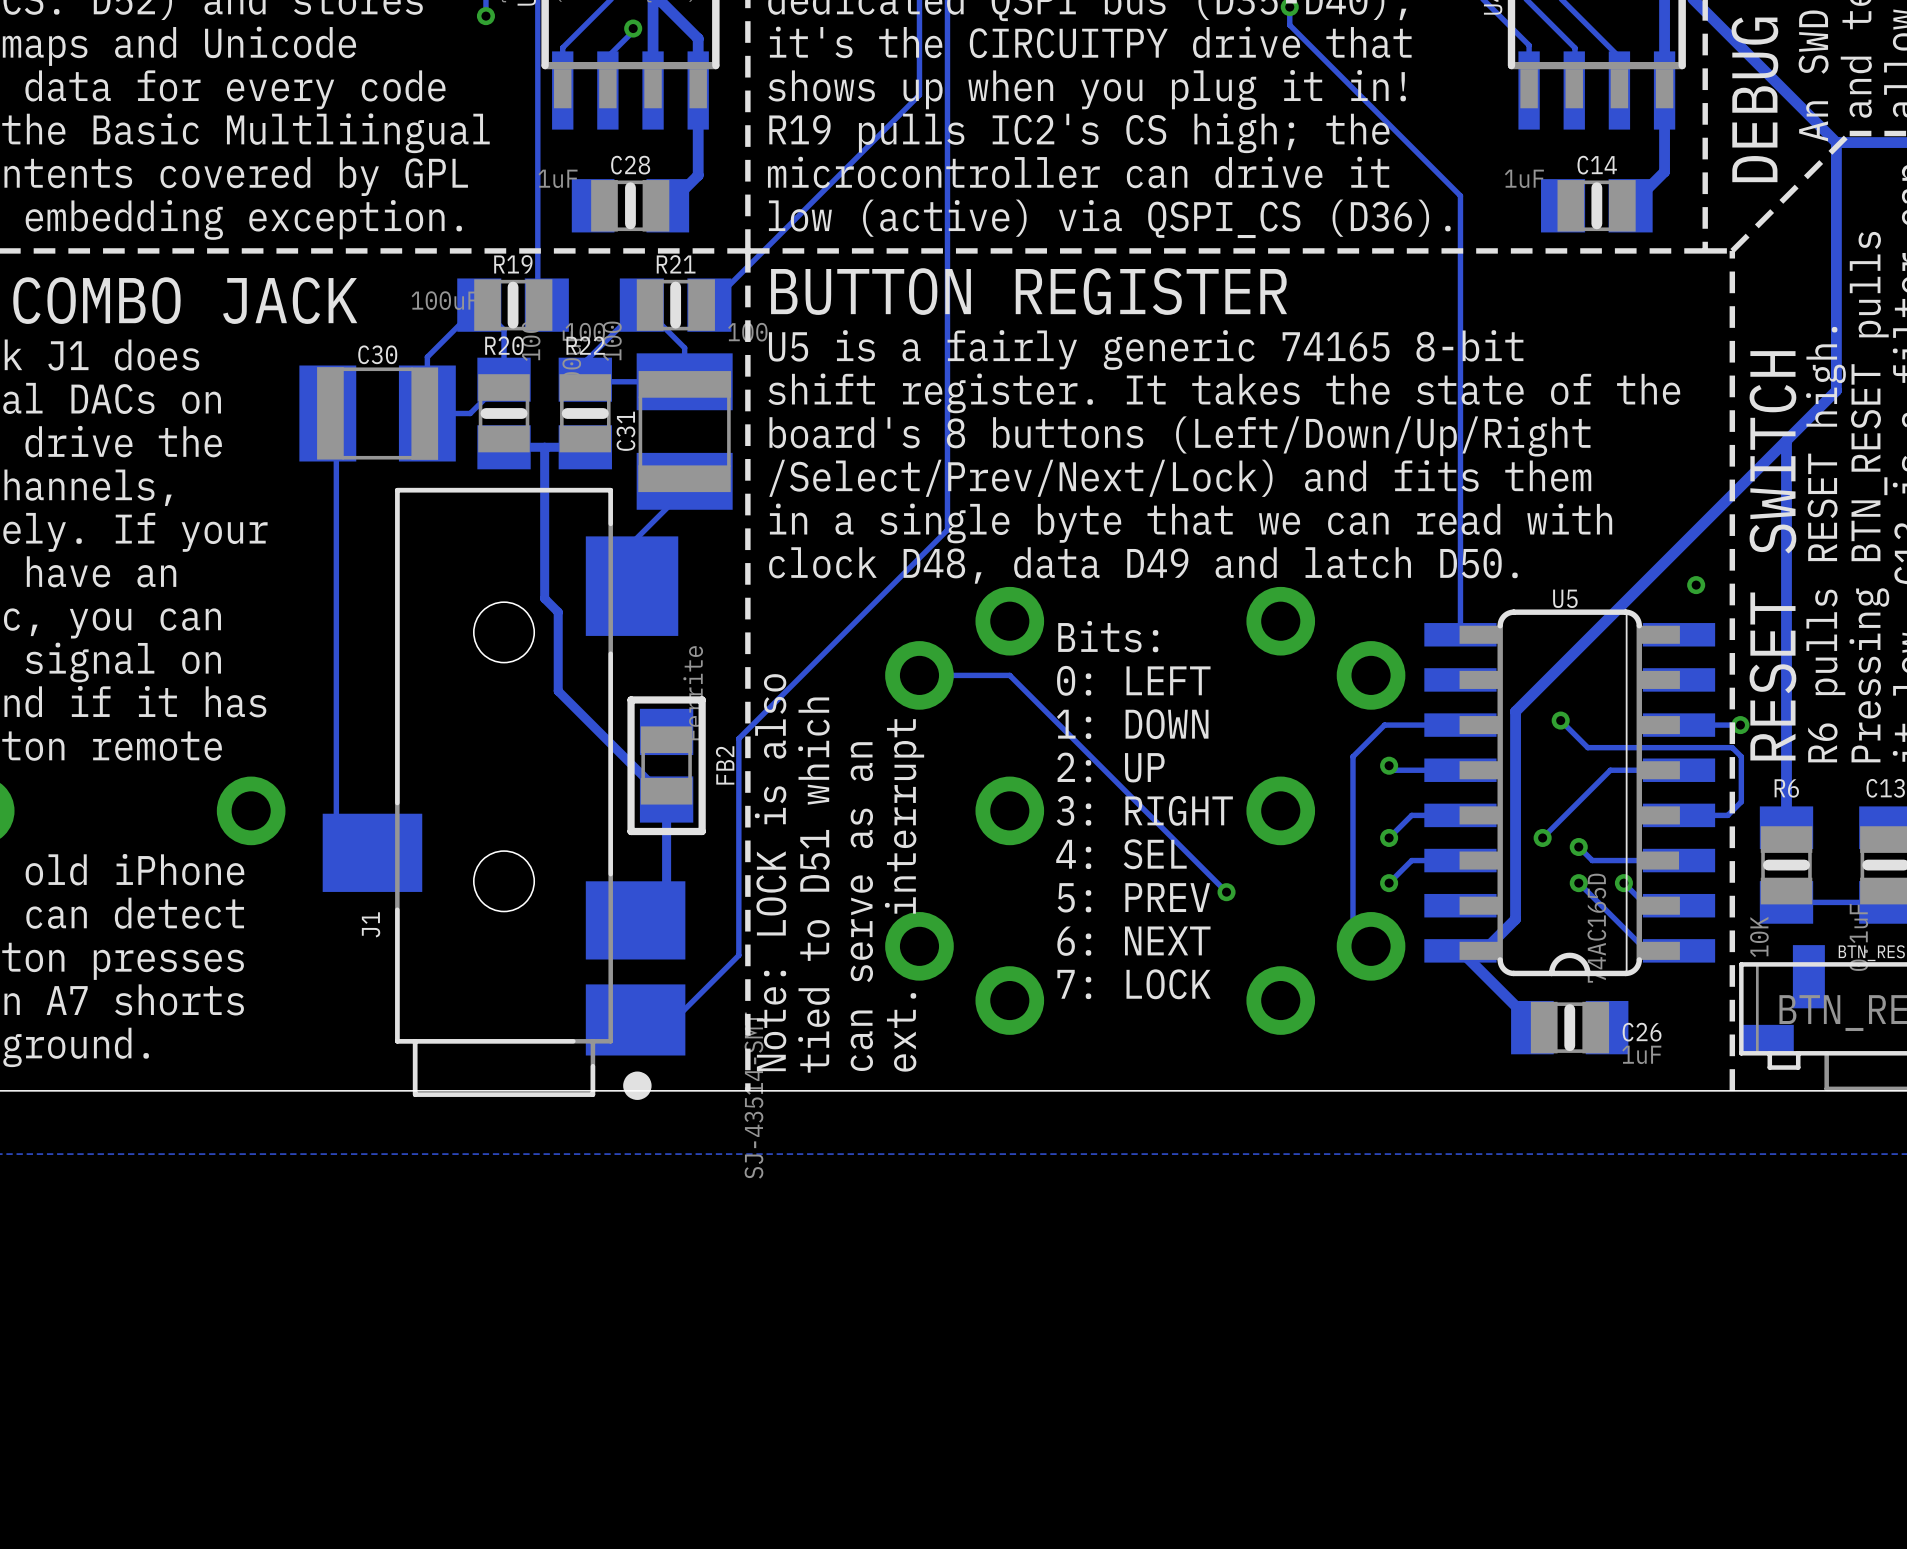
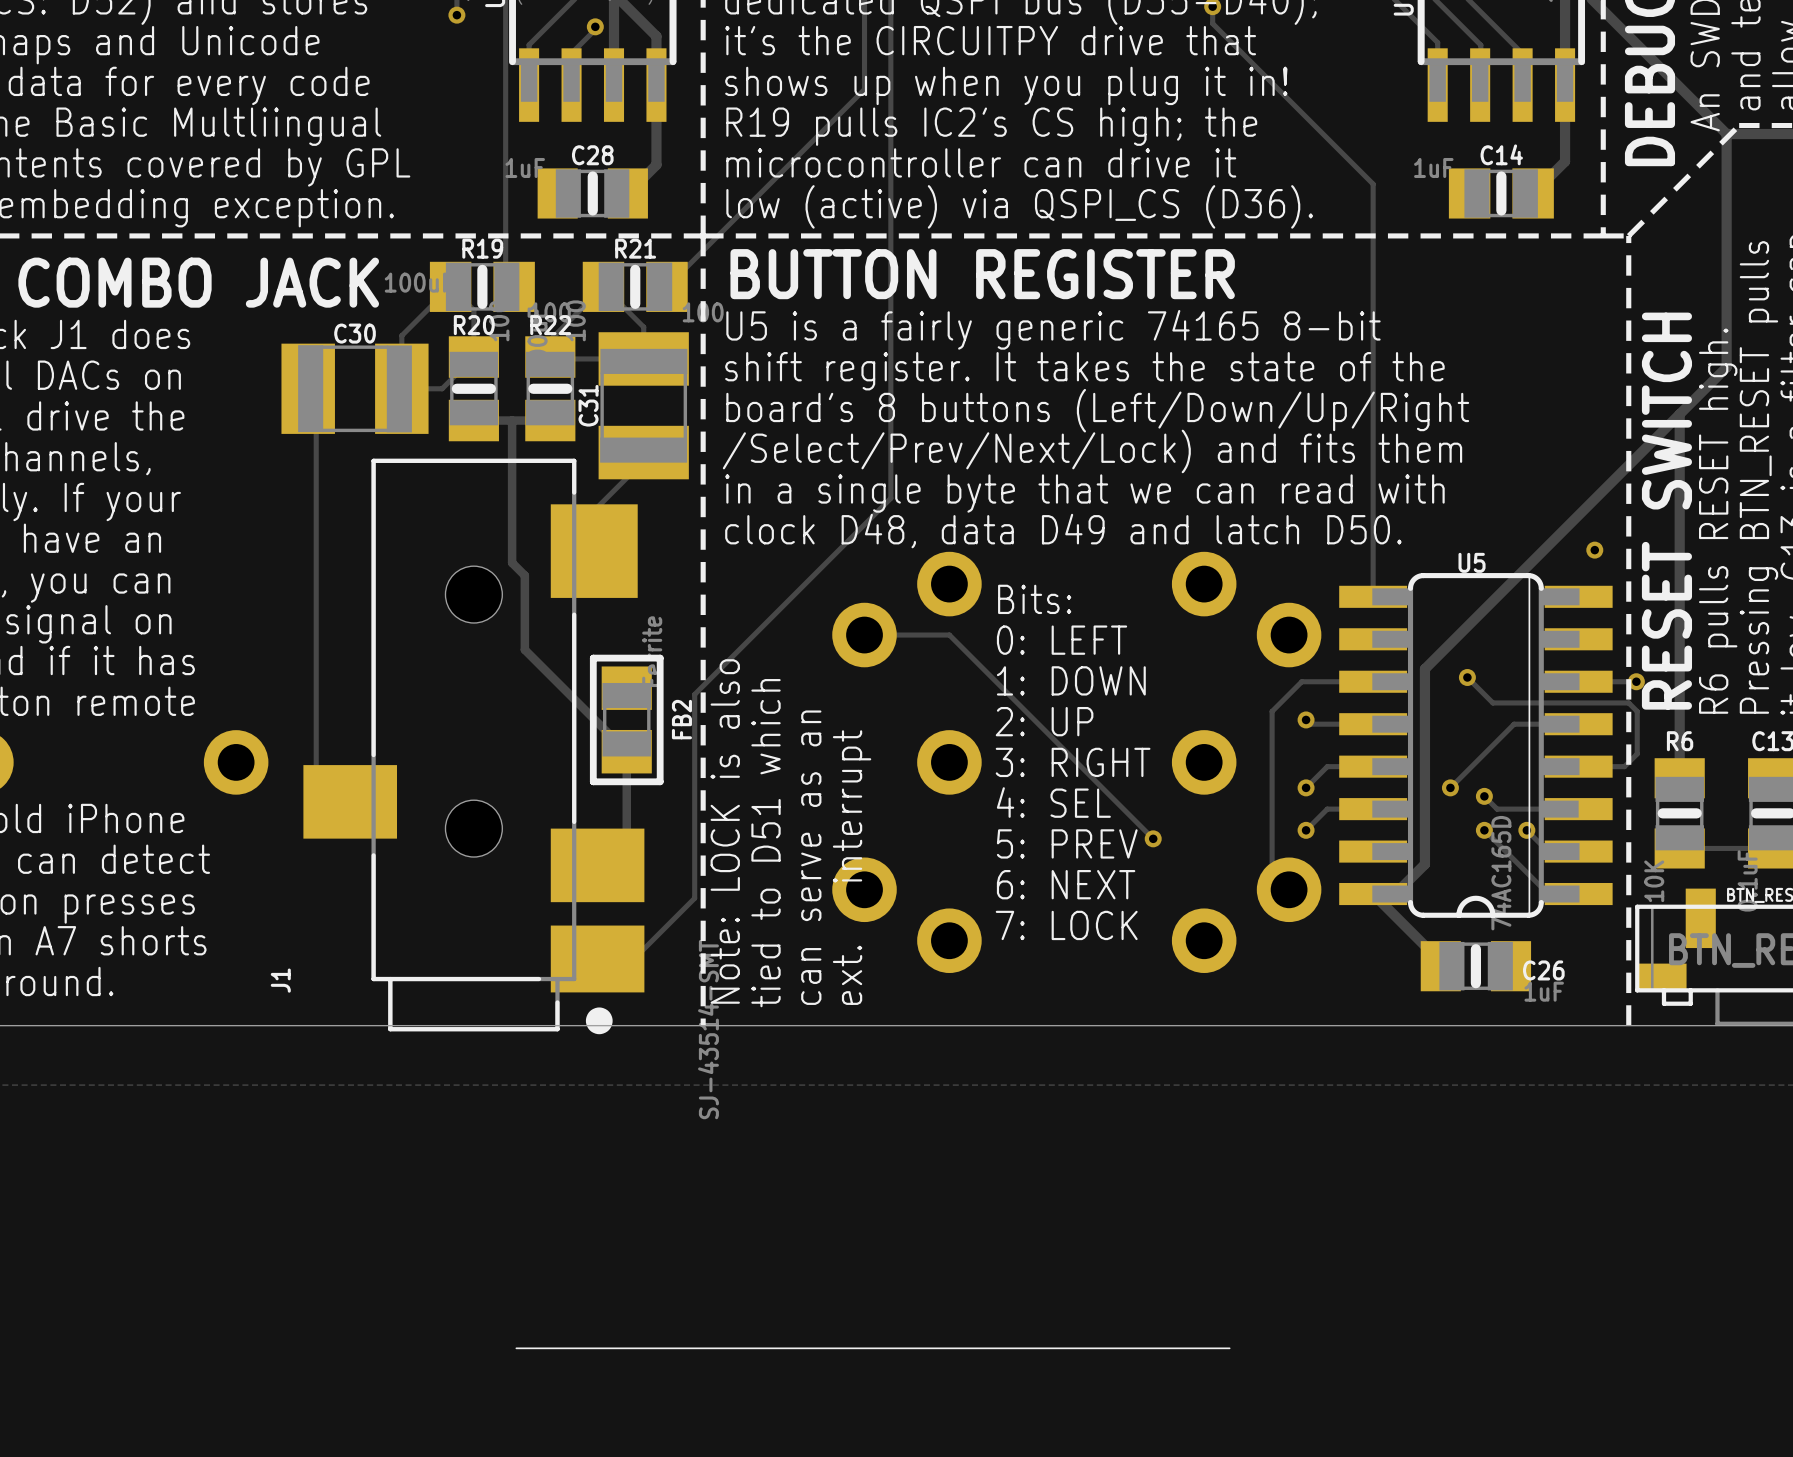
J1 name position: J1 (371, 924) -> J1 (280, 980)
line: none -> (1229, 1348) (516, 1348)

